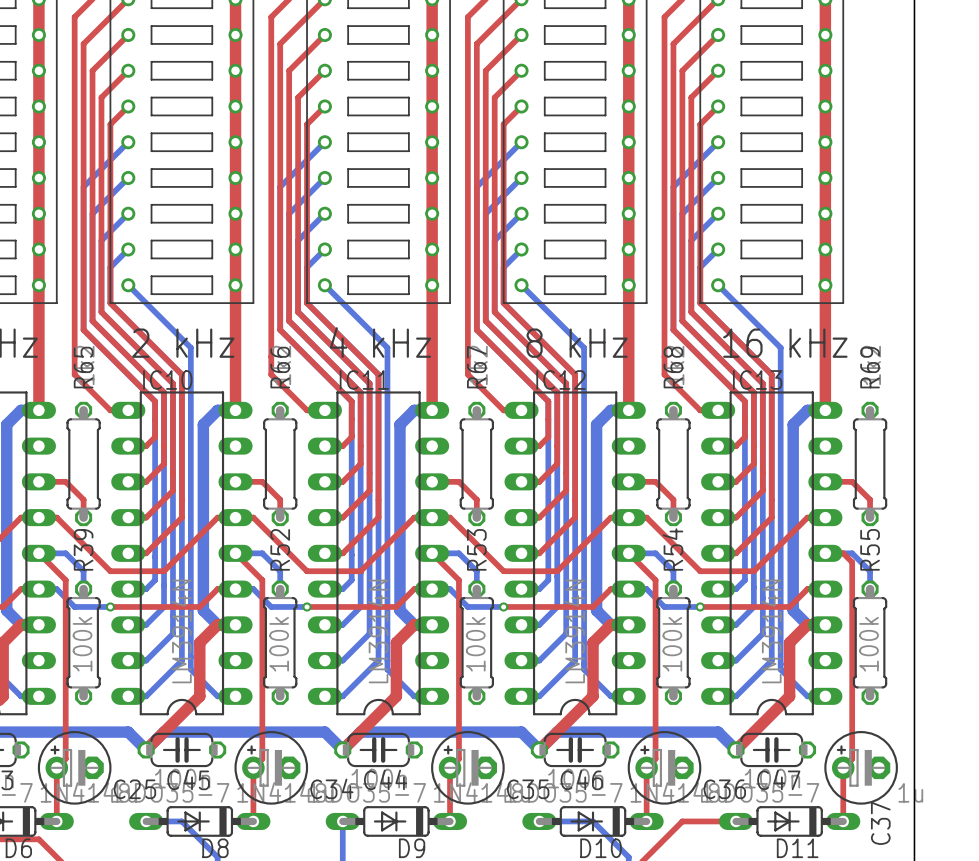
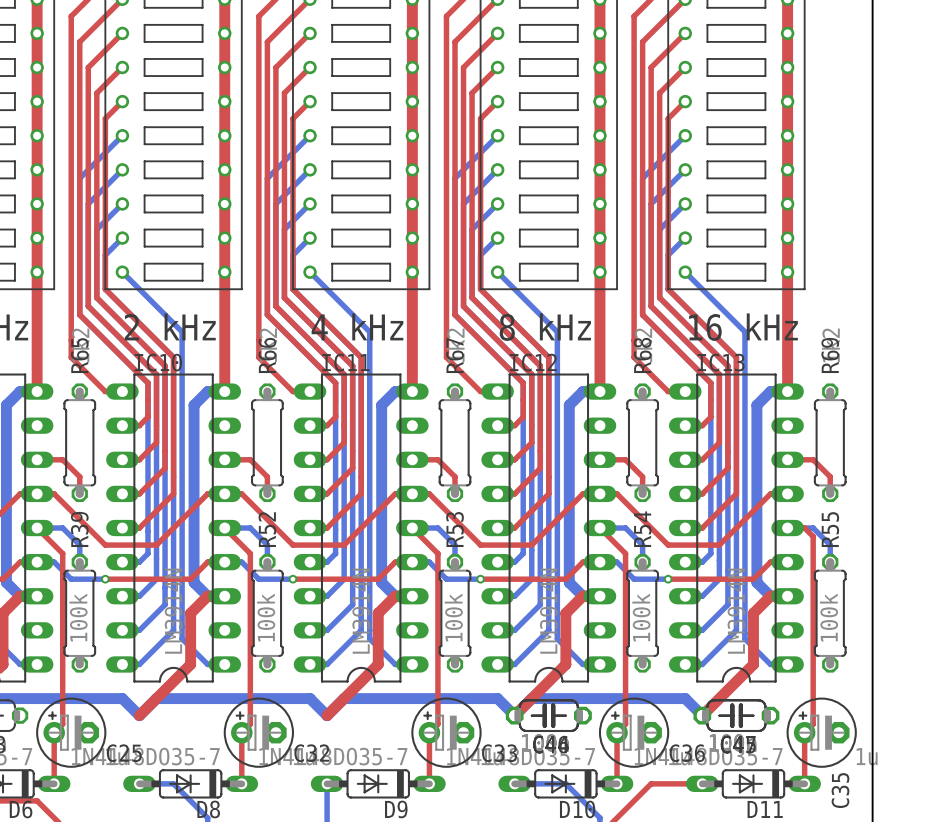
C45 footprint: [137, 732, 227, 768] -> [693, 699, 780, 733]
C44 footprint: [334, 732, 423, 768] -> [505, 699, 592, 733]
C34 name: C34 (331, 788) -> C32 (311, 753)
C35 name: C35 (528, 789) -> C33 (499, 753)
C37 name: C37 (880, 823) -> C35 (840, 790)

